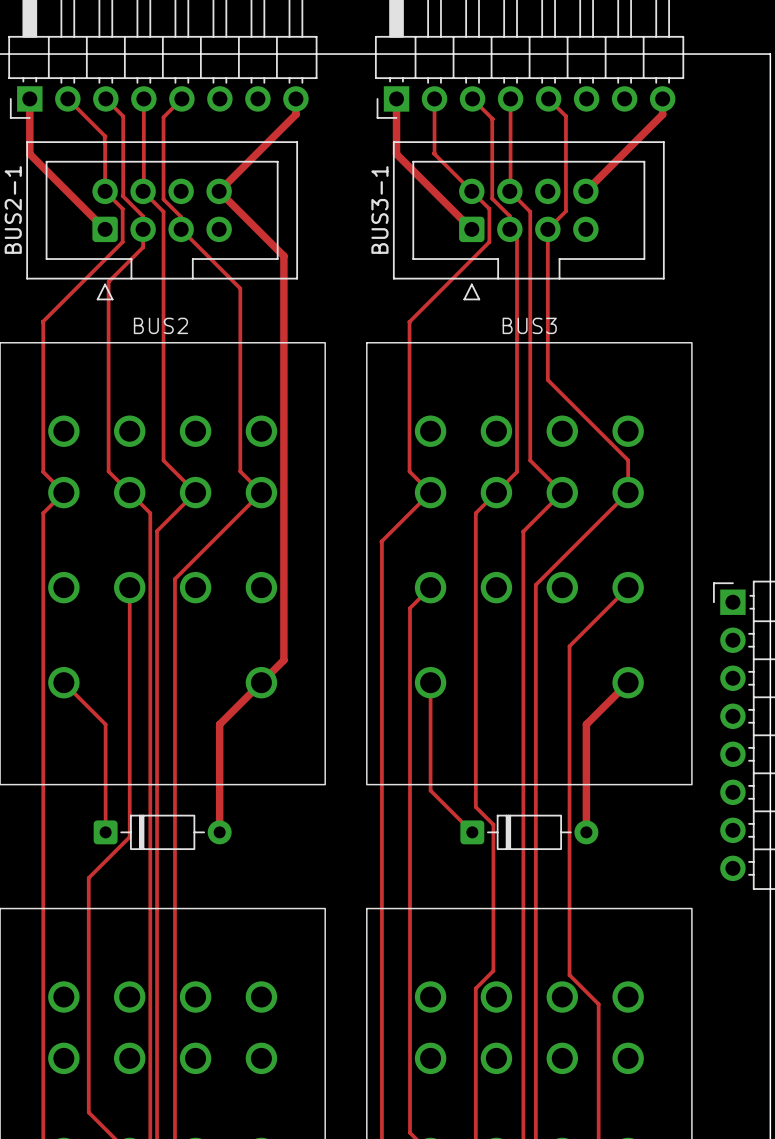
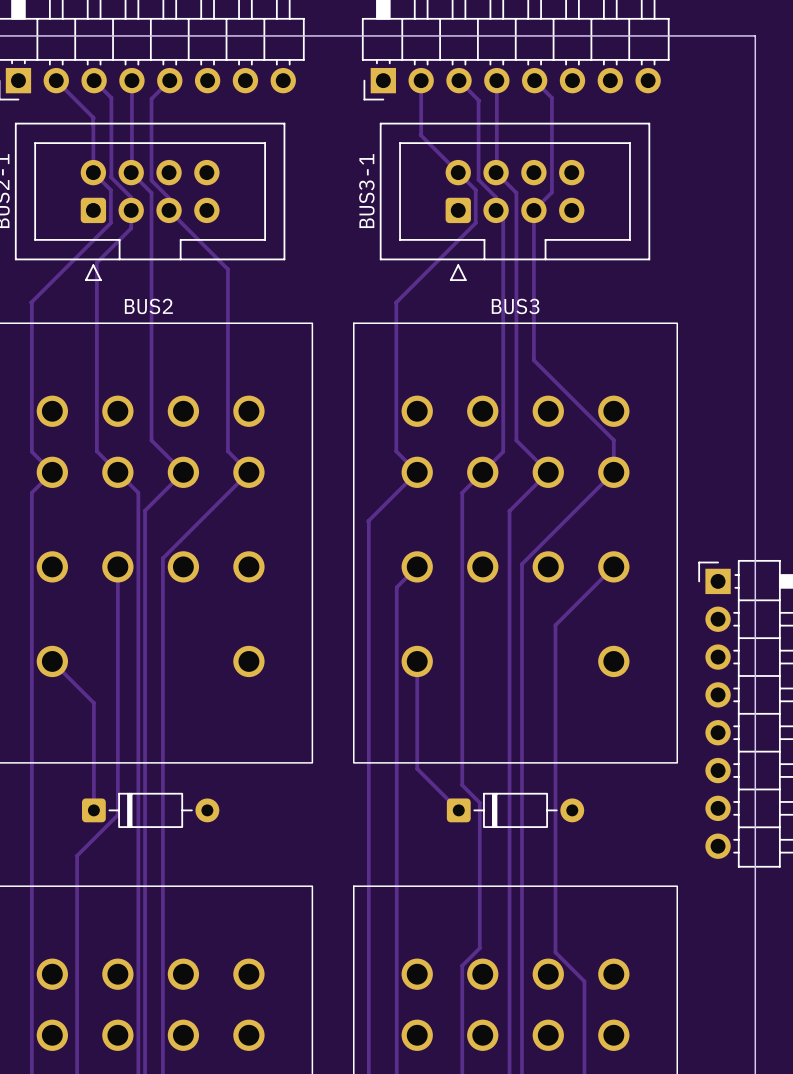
track: (29, 98) (29, 154) (105, 229) -> none
track: (295, 98) (295, 114) (219, 191) (283, 256) (283, 660) (219, 724) (219, 832) -> none
track: (396, 98) (396, 154) (471, 229) -> none
track: (662, 98) (662, 114) (585, 191) -> none
track: (628, 682) (586, 724) (586, 832) -> none

